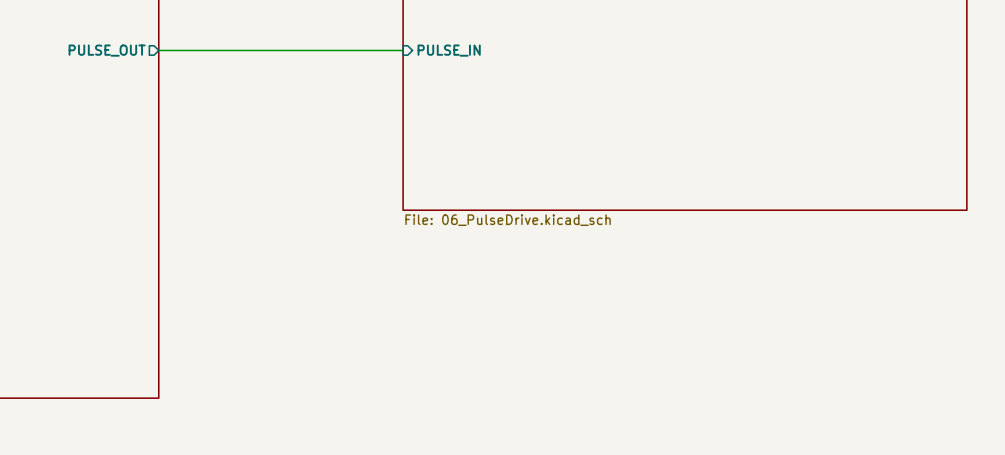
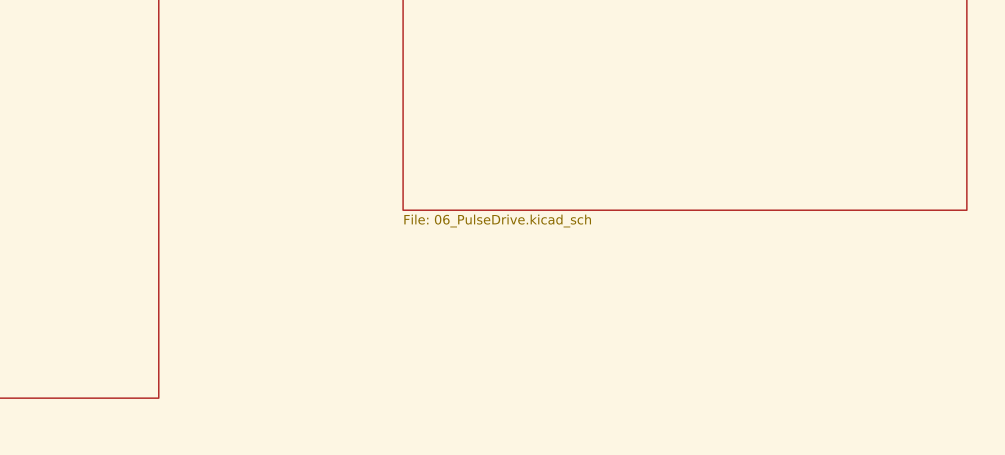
sheet pin: PULSE_OUT (107, 50) -> none
wire: (158, 50) (403, 50) -> none
sheet pin: PULSE_IN (449, 50) -> none

